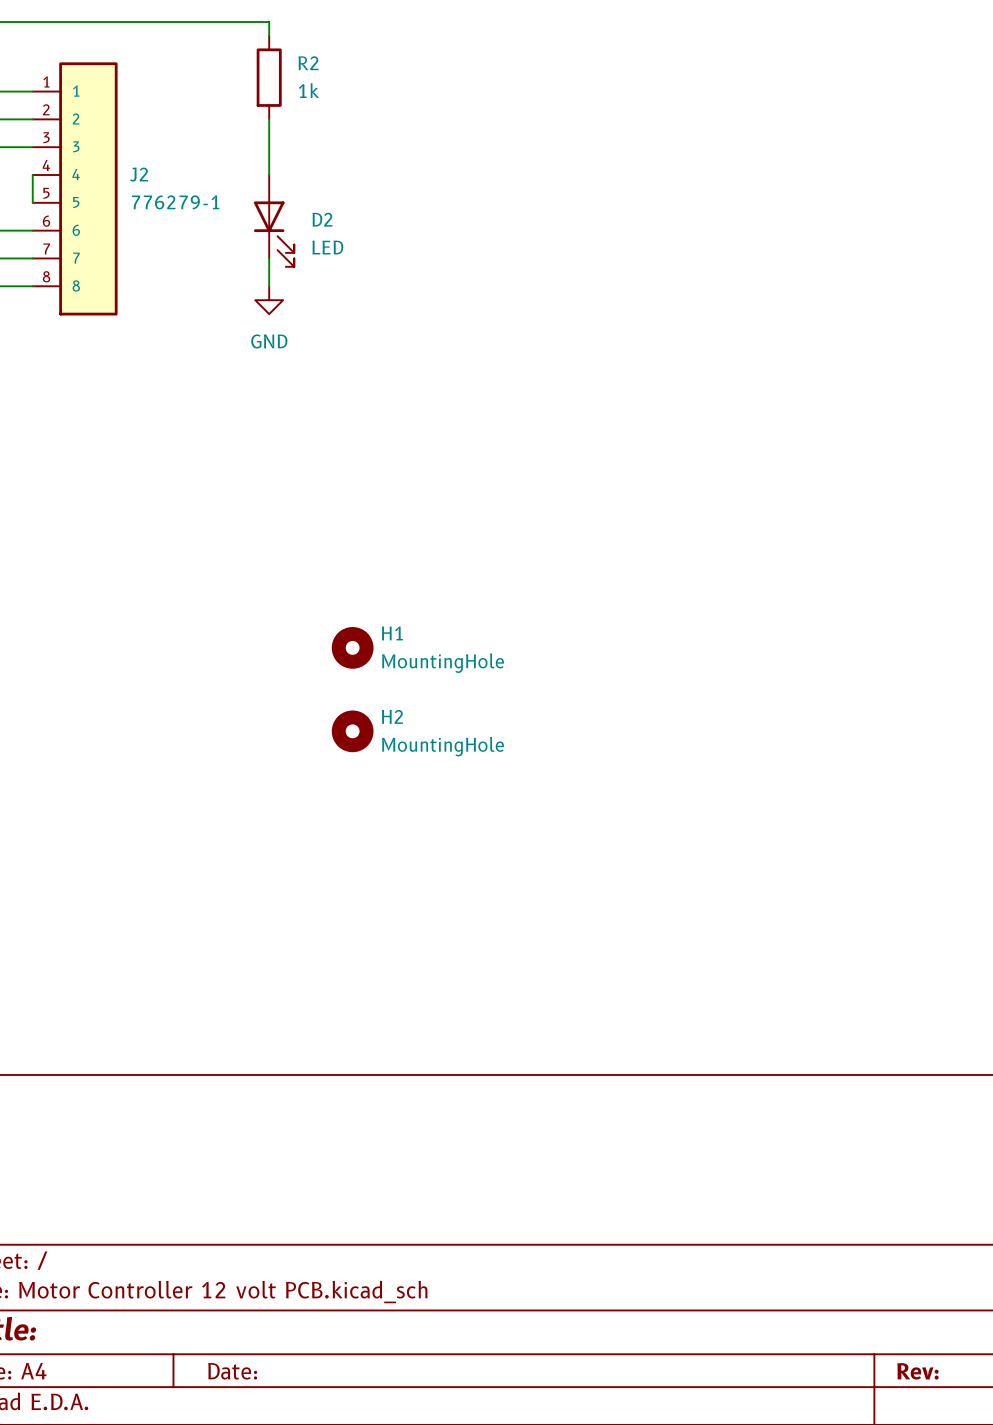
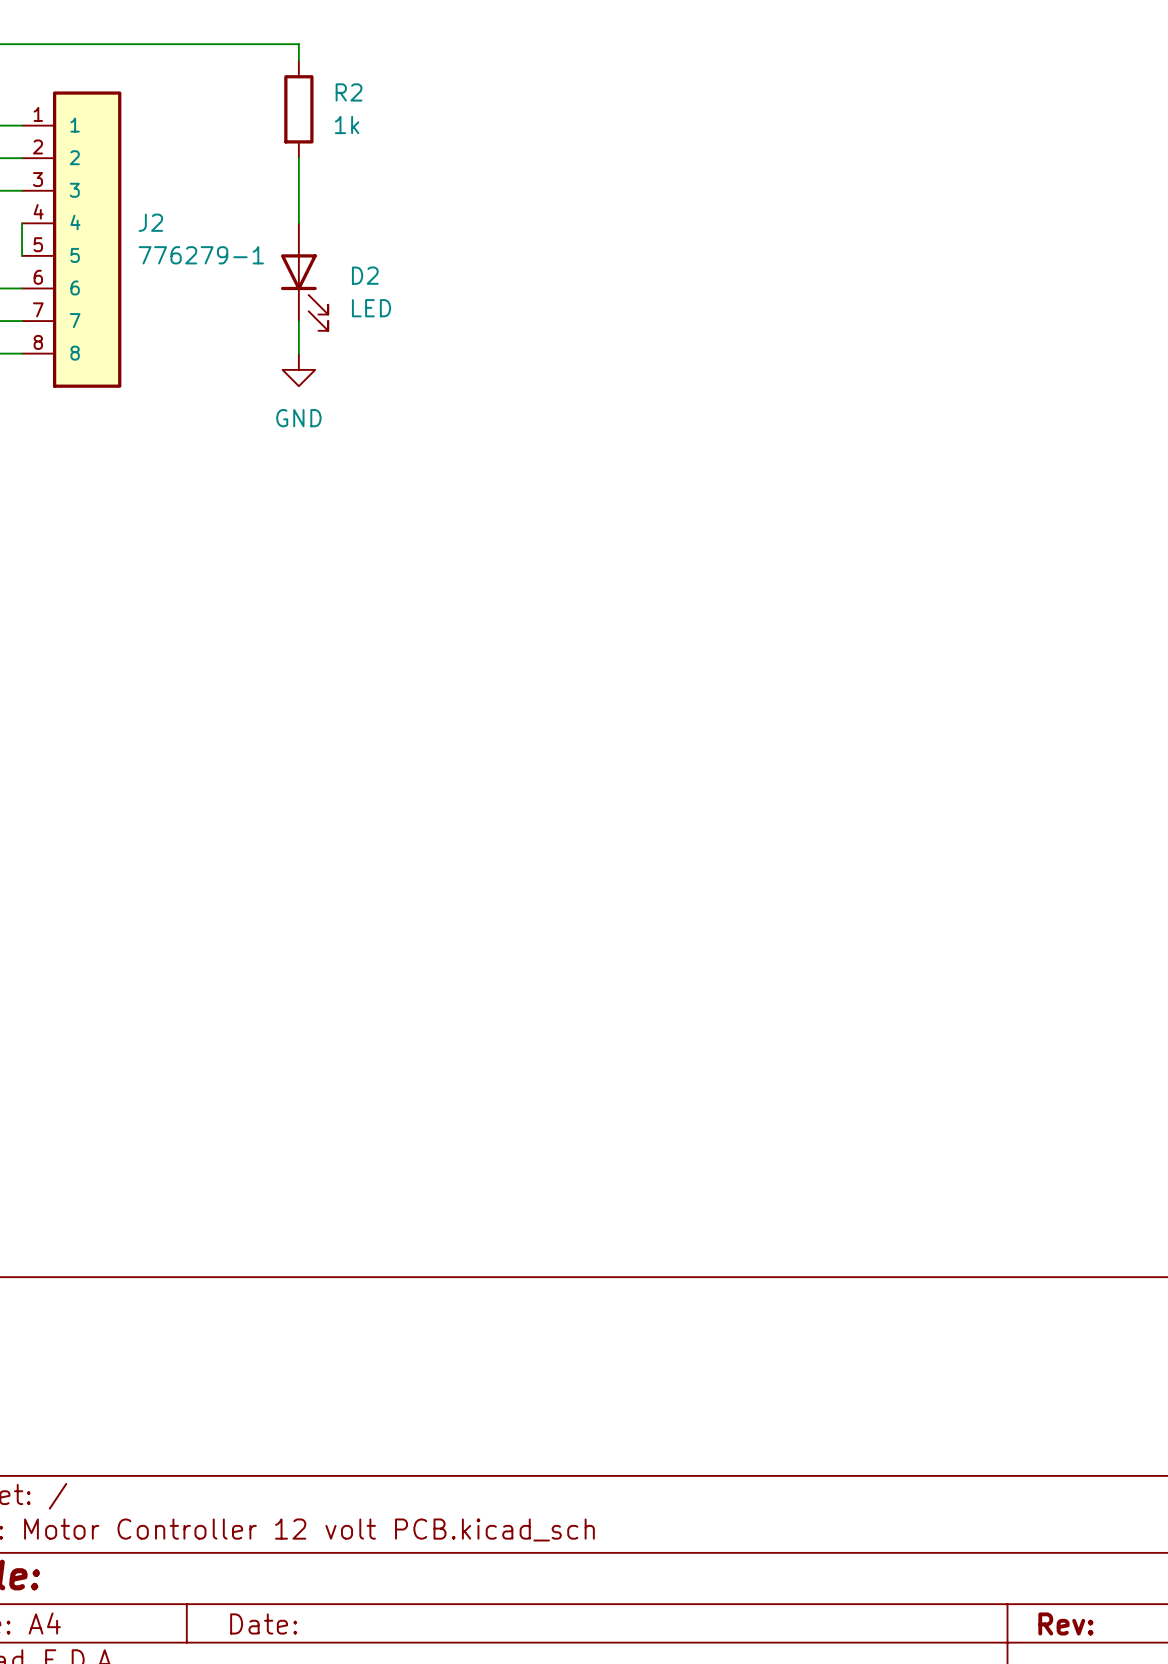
H1: MountingHole (352, 647) -> none
H2: MountingHole (352, 731) -> none

